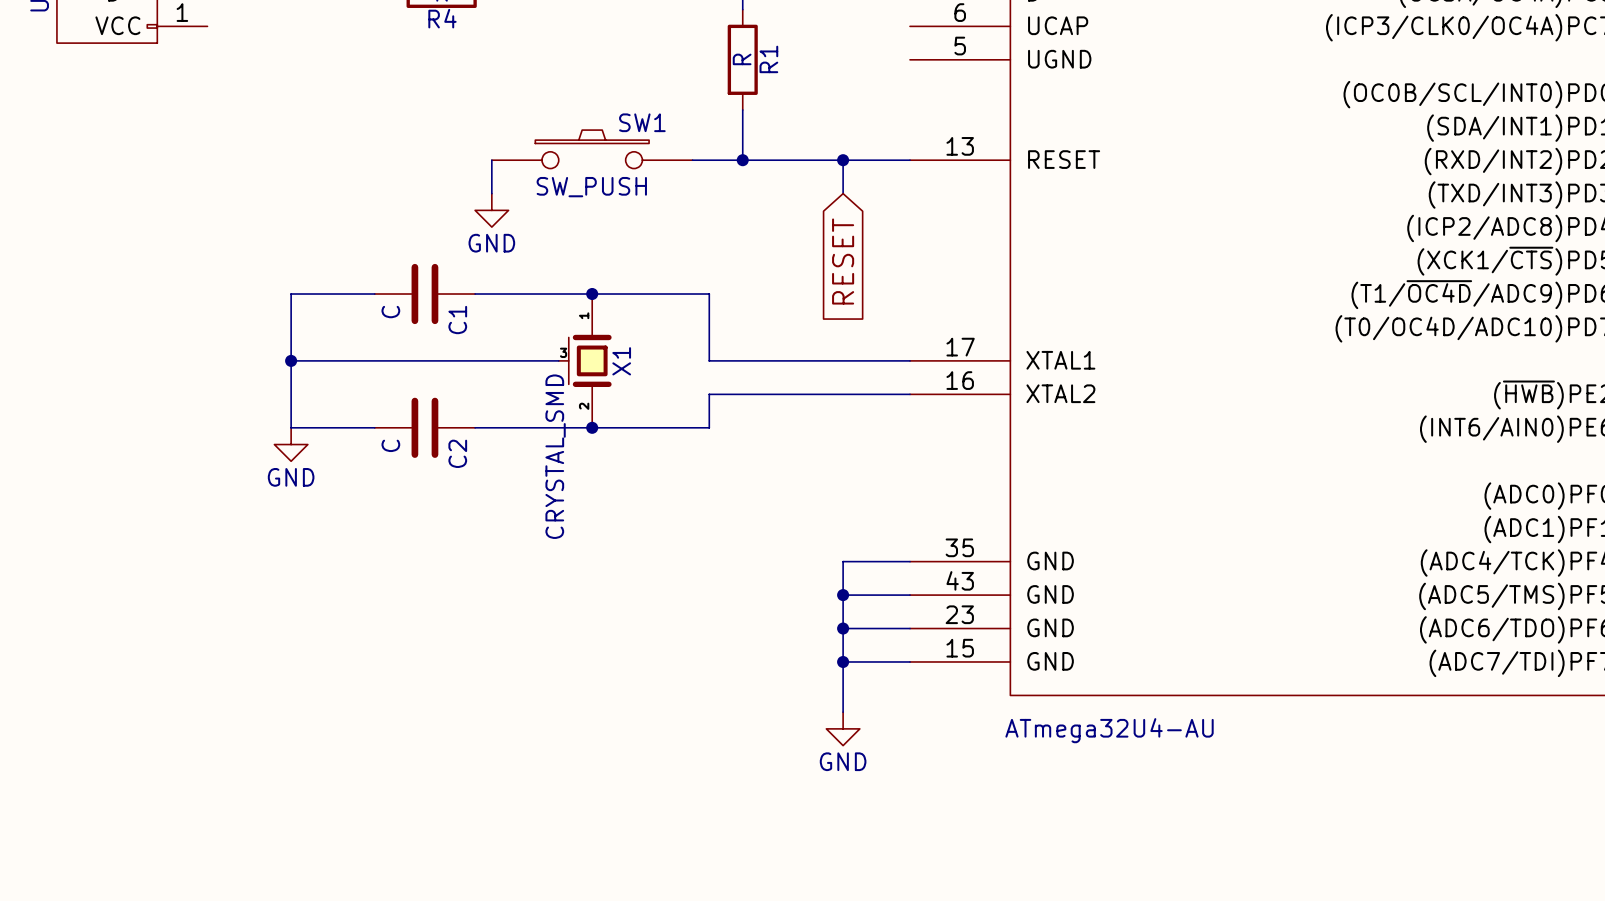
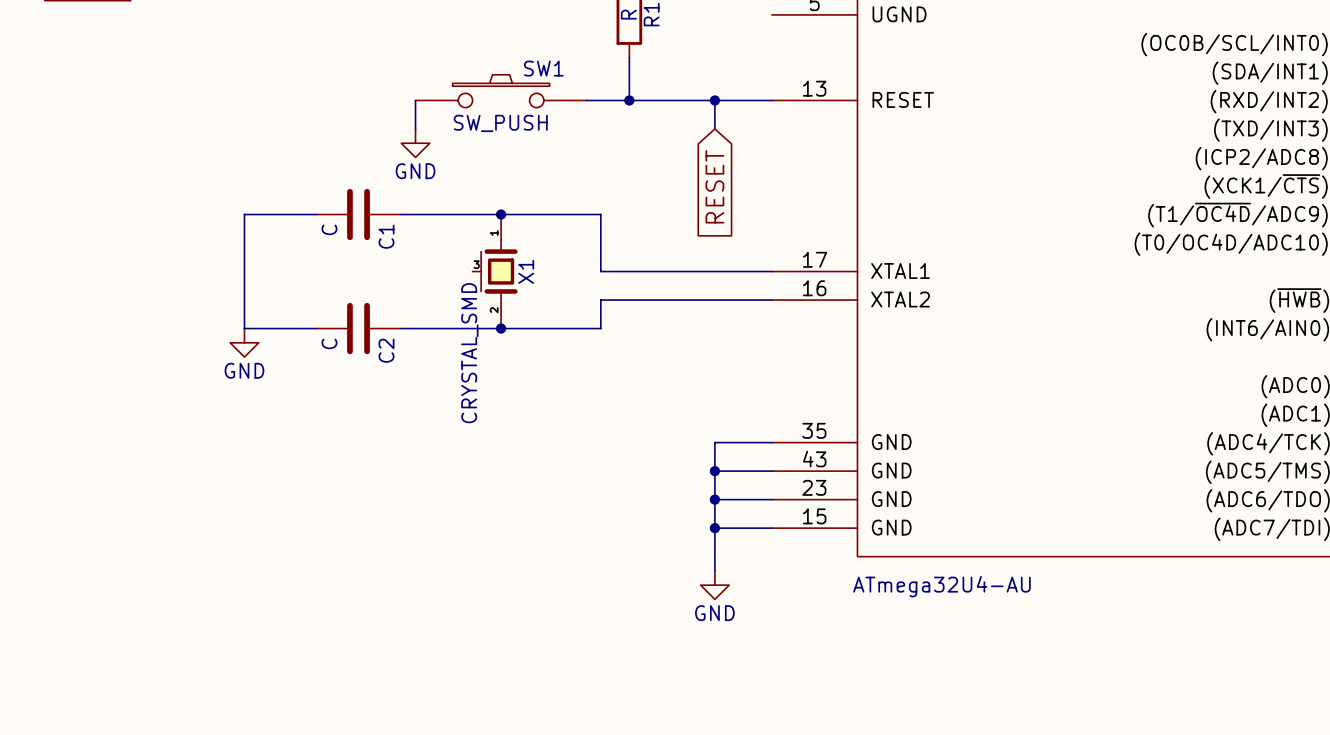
wire: (291, 360) (558, 360) -> none
junction: (291, 360) -> none

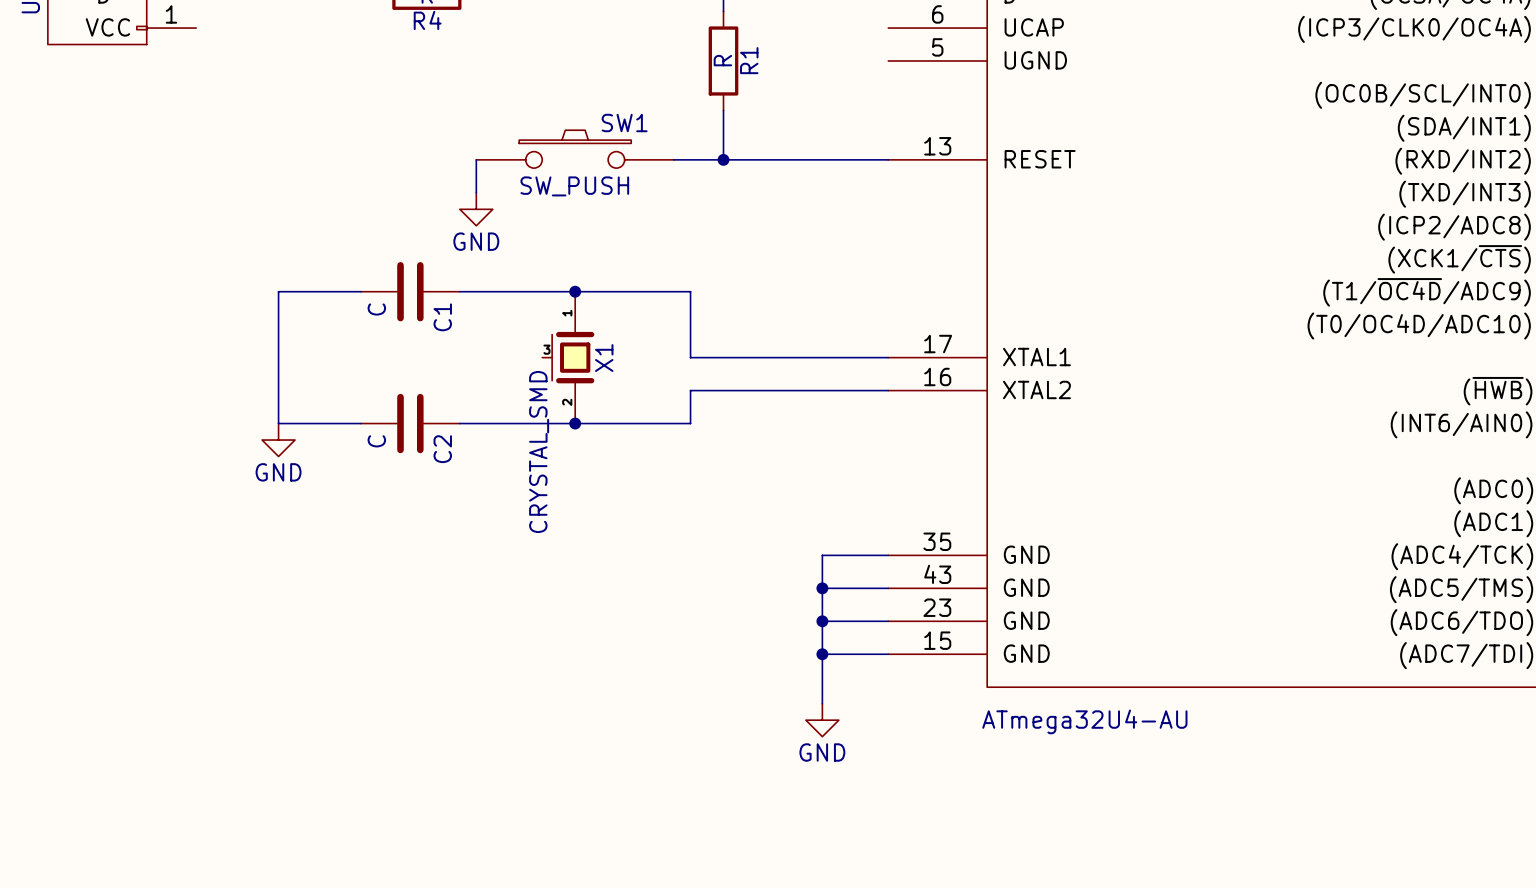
wire: (714, 100) (714, 128) -> none
junction: (714, 100) -> none
global label: RESET (714, 186) -> none

